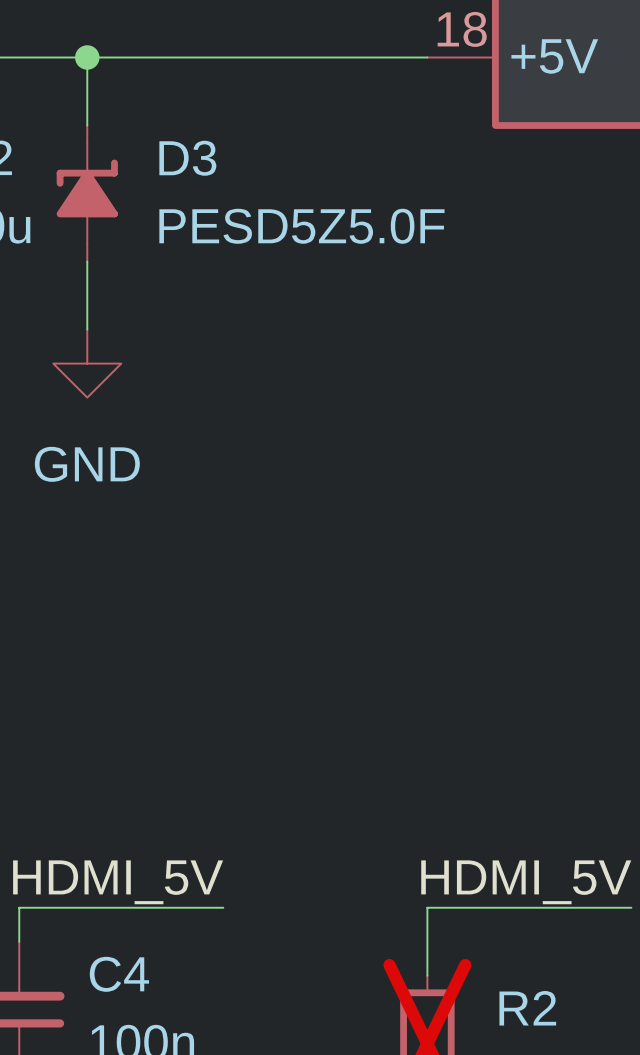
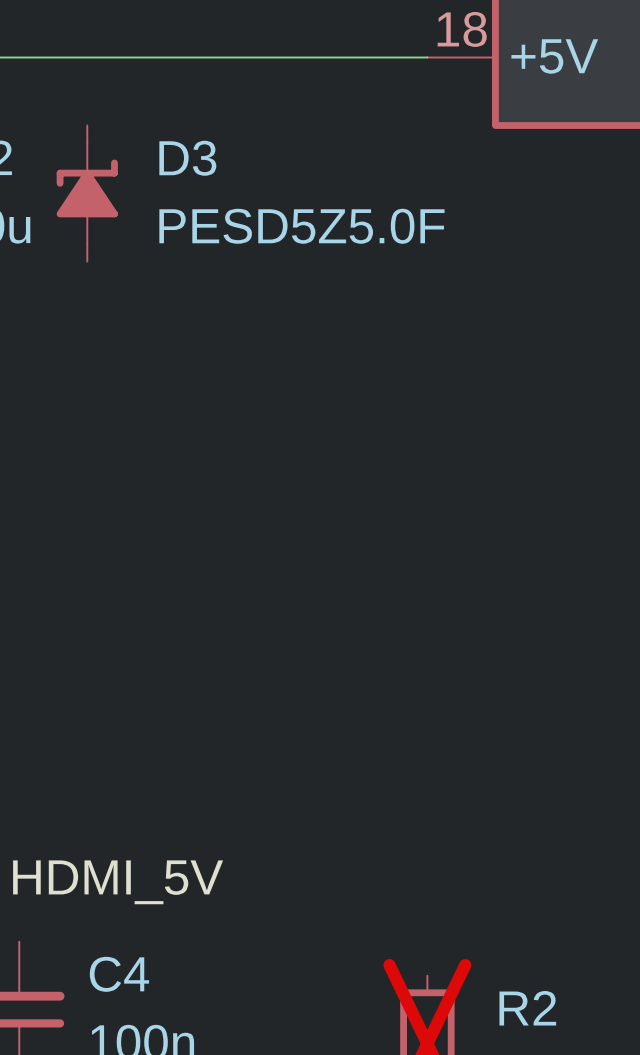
wire: (87, 57) (87, 125) -> none
junction: (87, 57) -> none
wire: (87, 261) (87, 329) -> none
power symbol: GND (87, 363) -> none
label: HDMI_5V (526, 882) -> none
wire: (223, 907) (19, 907) (19, 941) -> none
wire: (631, 907) (427, 907) (427, 975) -> none

